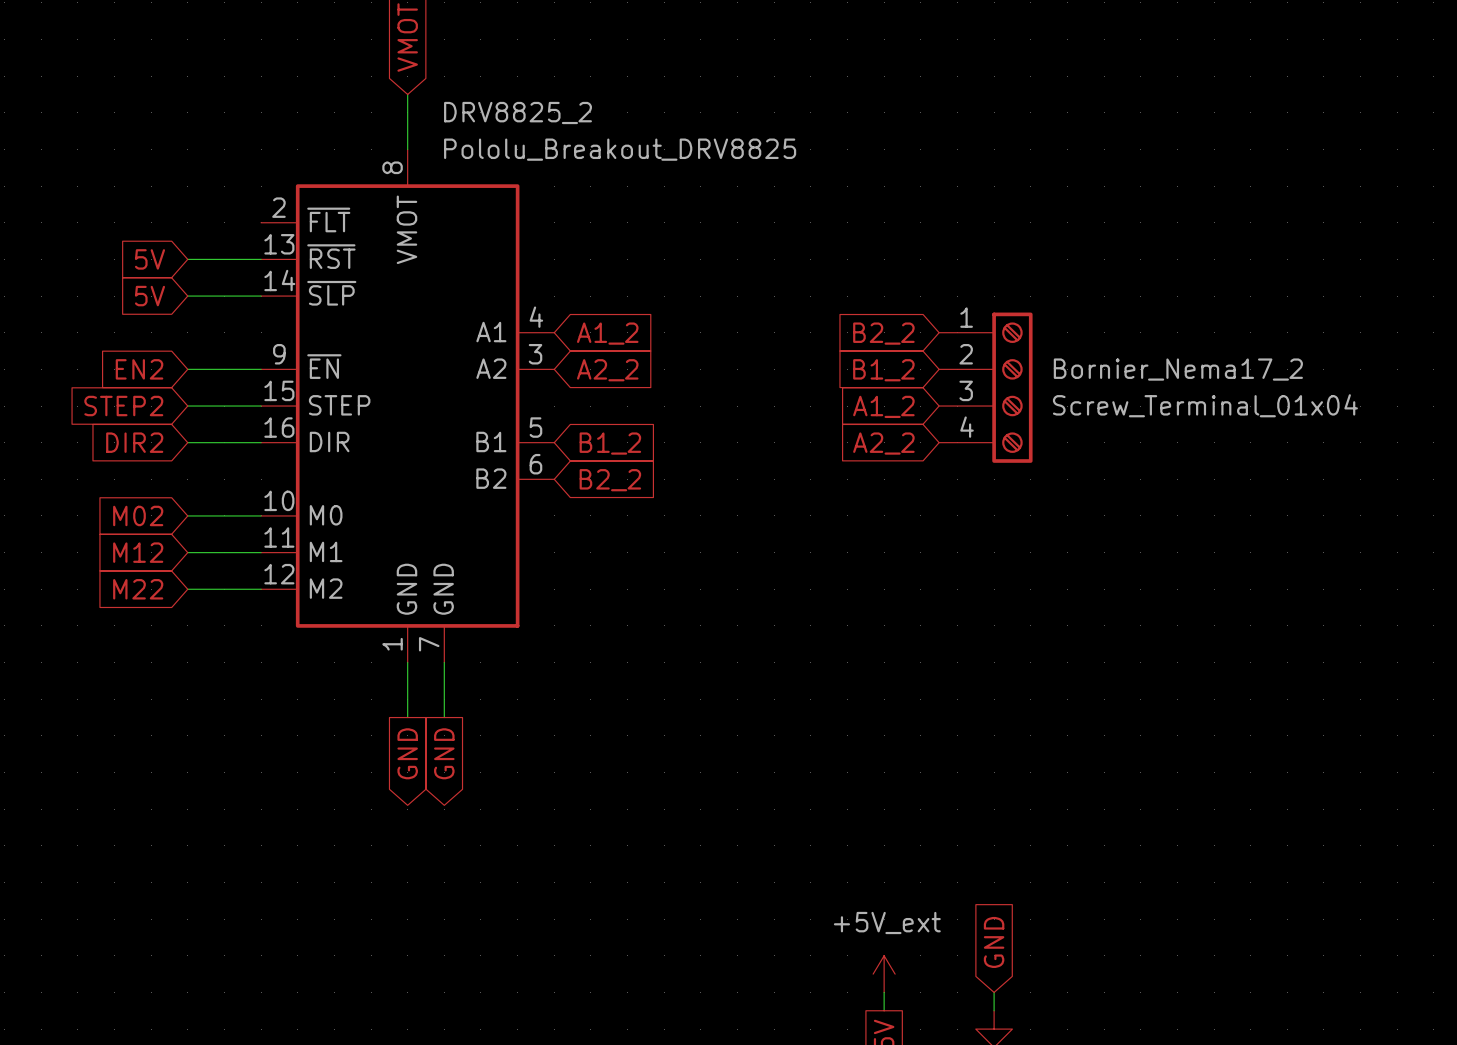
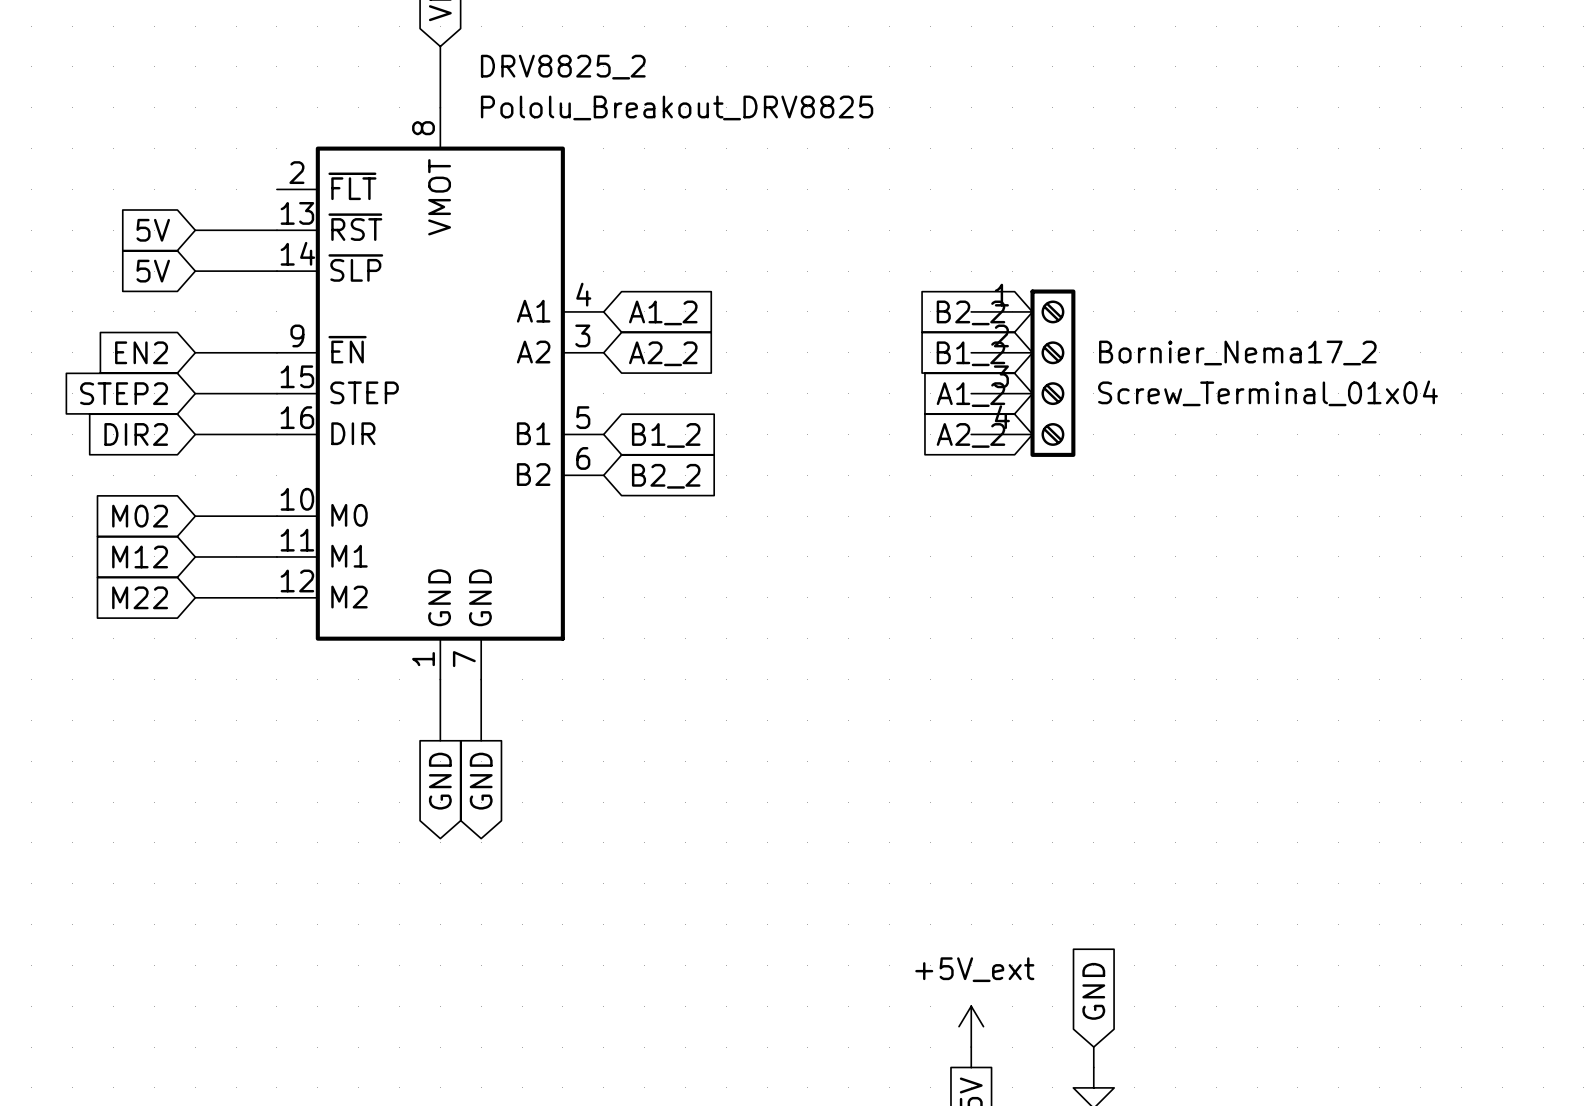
Bornier_Nema17_2 position: (985, 387) -> (1023, 373)

